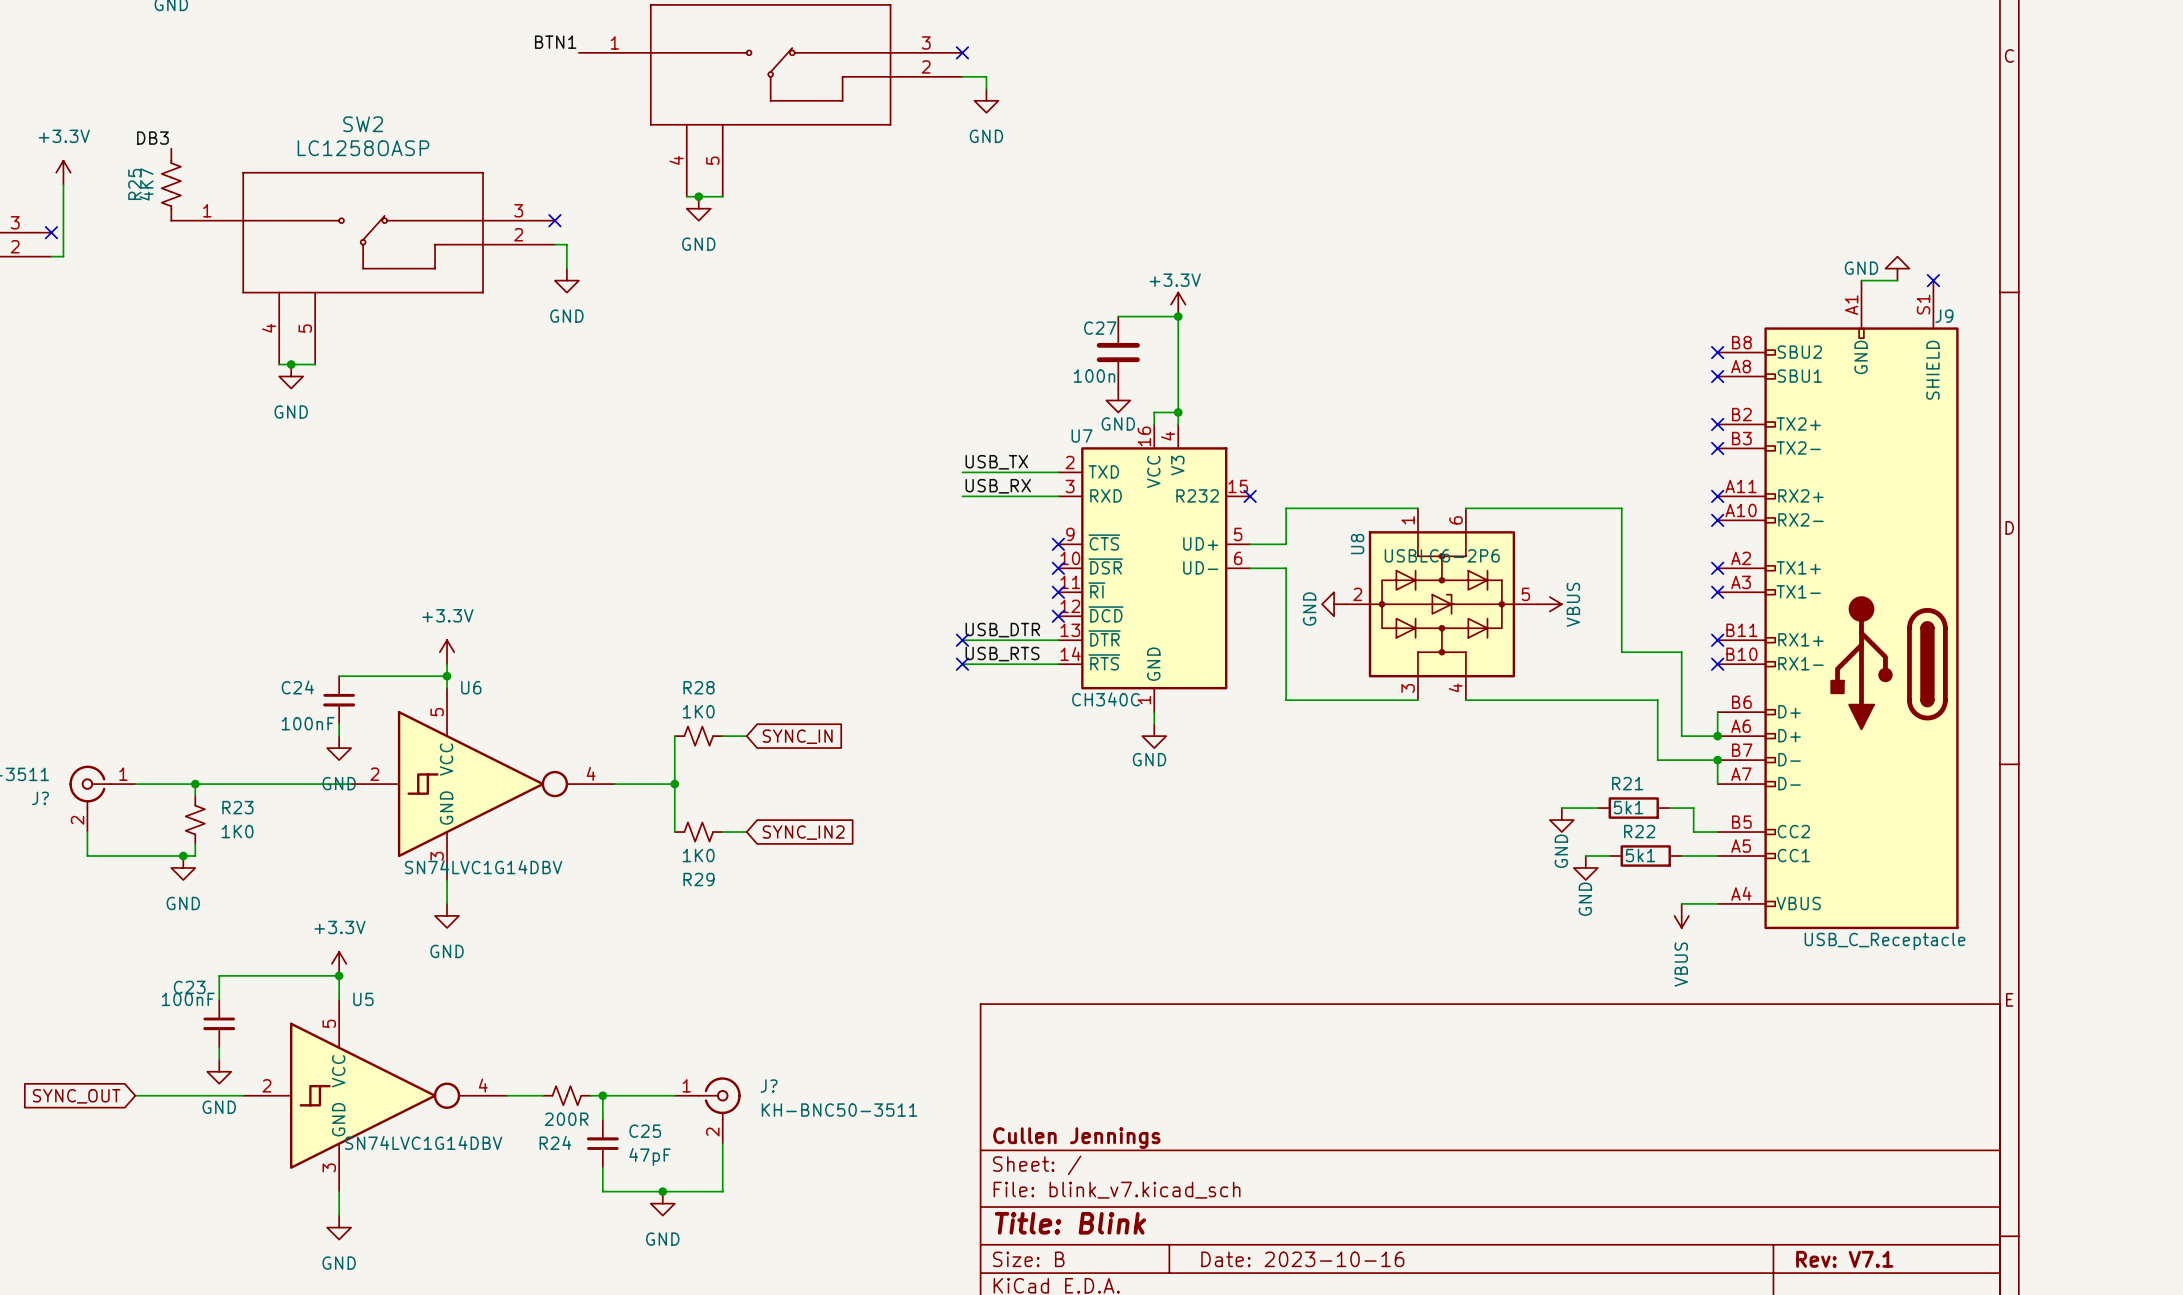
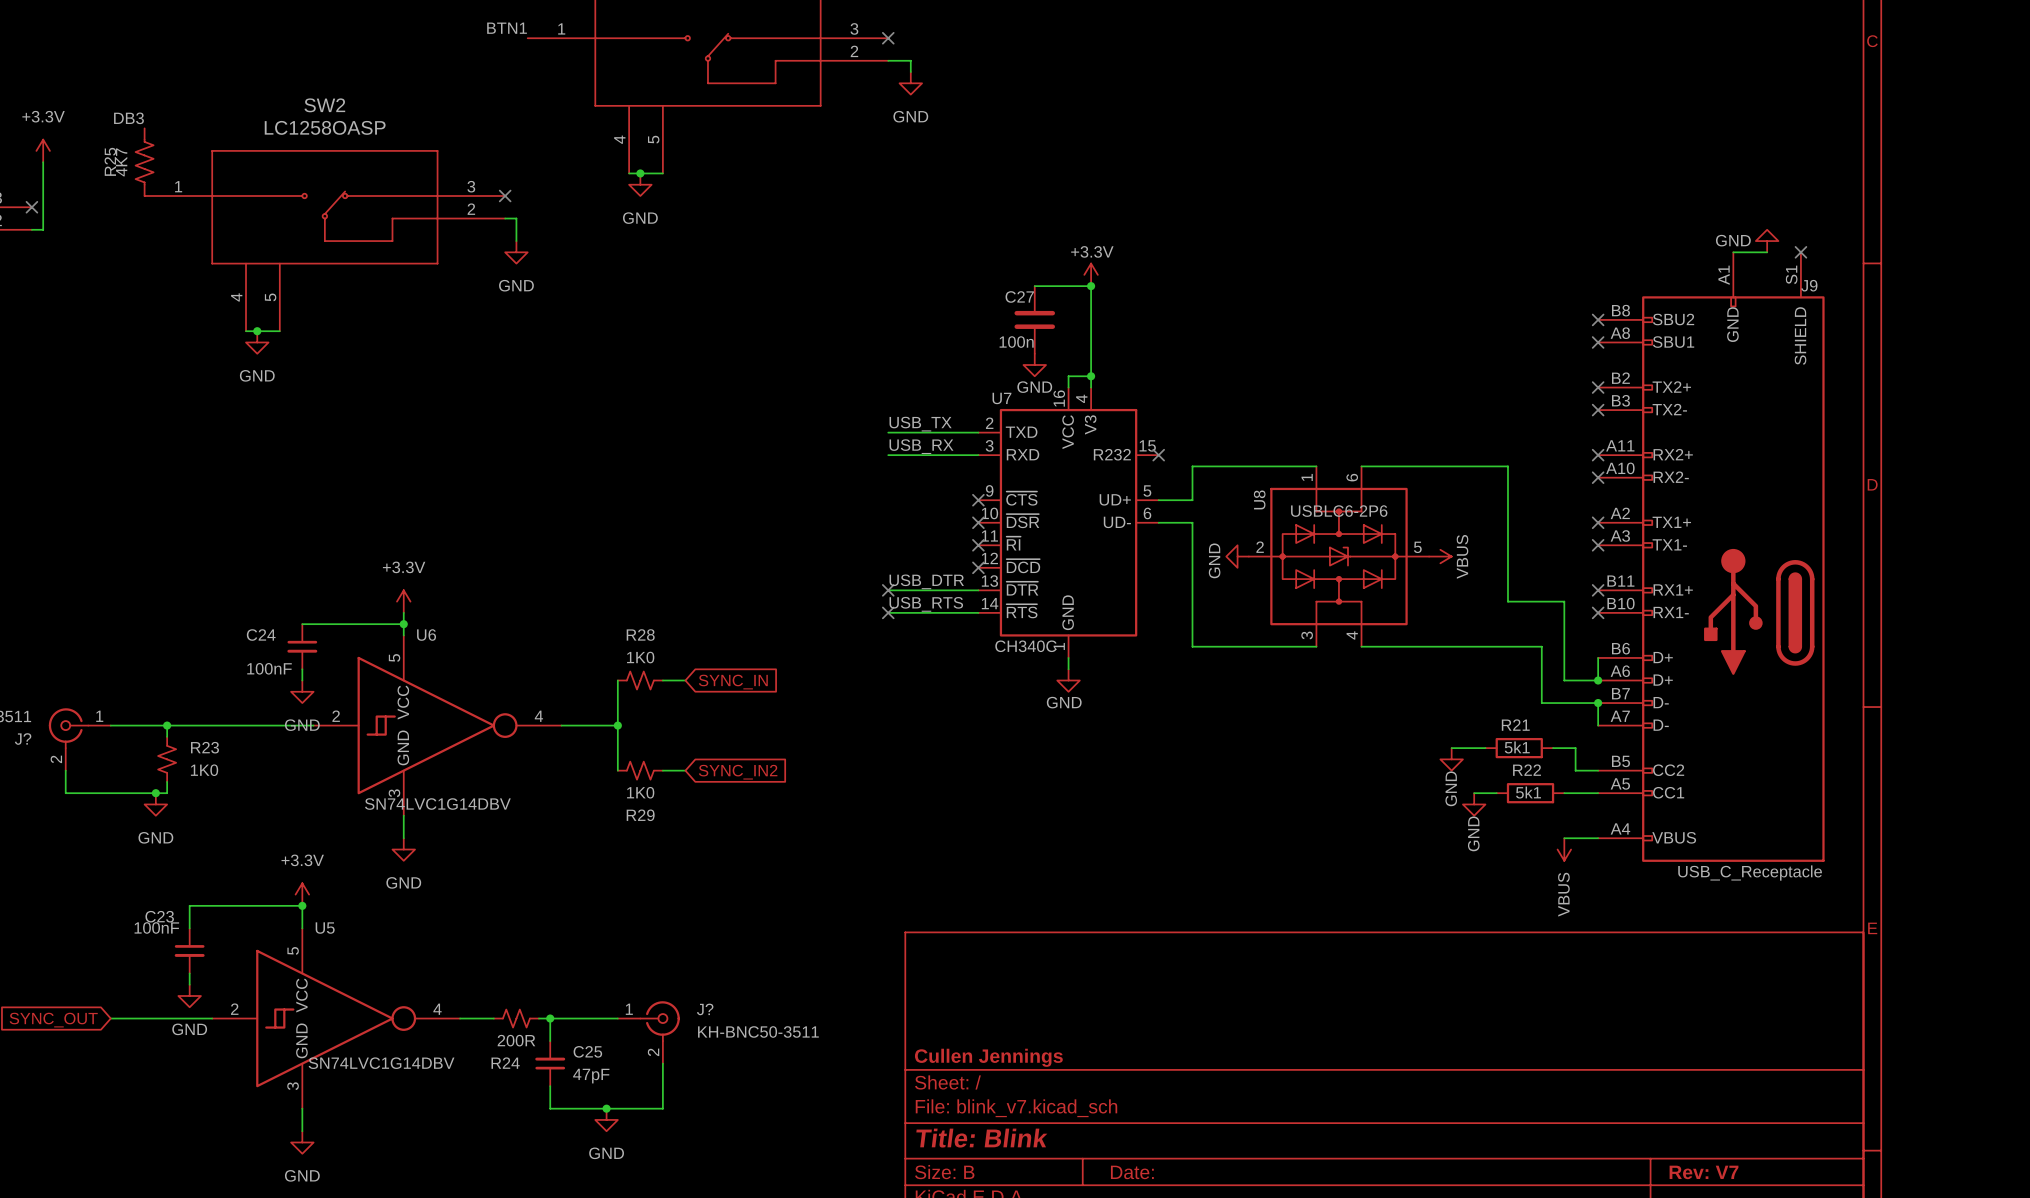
title block: Date: 2023-10-16 (1302, 1259) -> Date: (1132, 1172)
title block: Rev: V7.1 (1844, 1259) -> Rev: V7 (1704, 1172)

